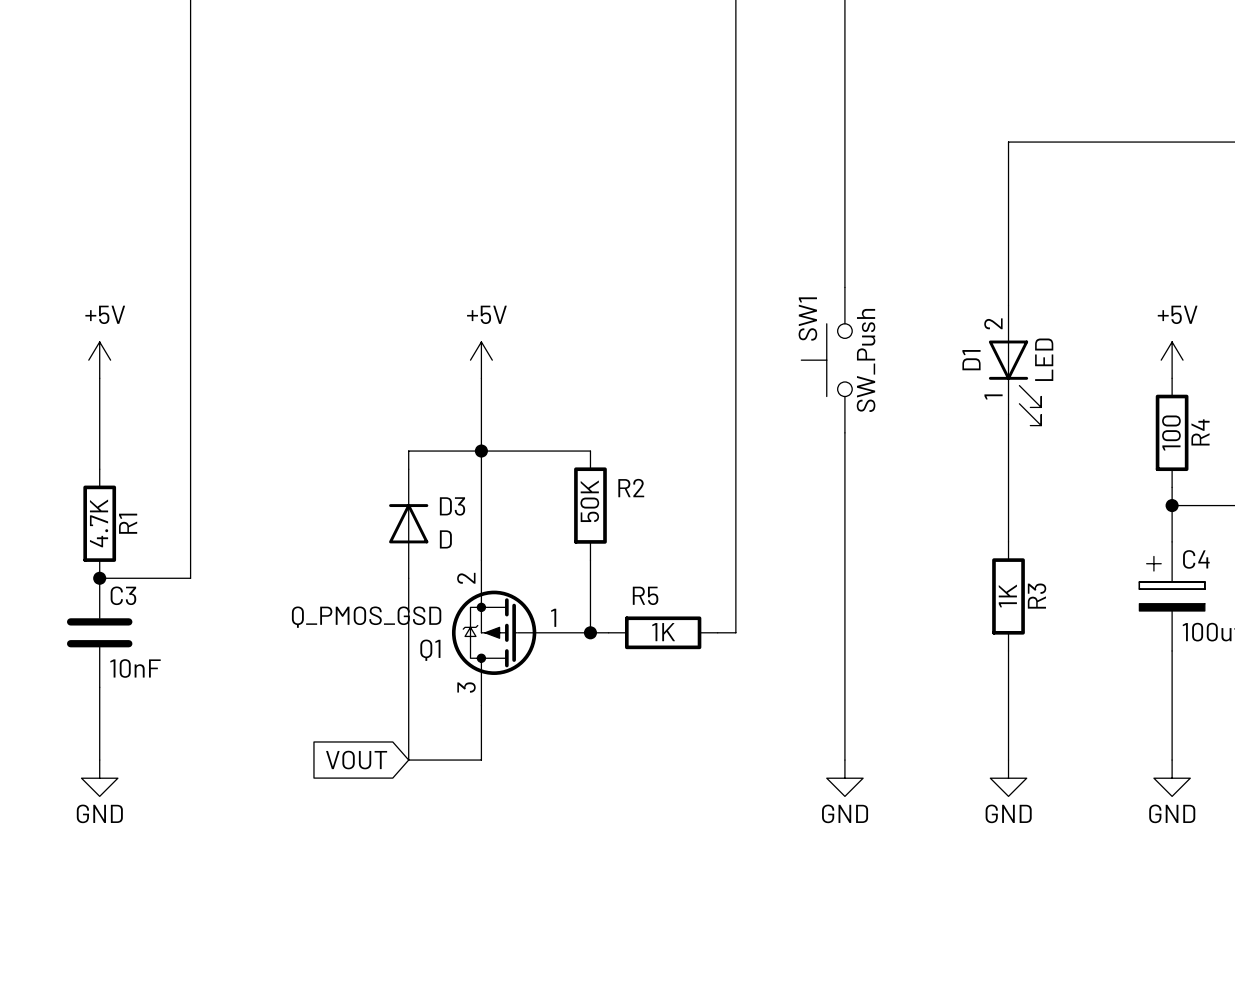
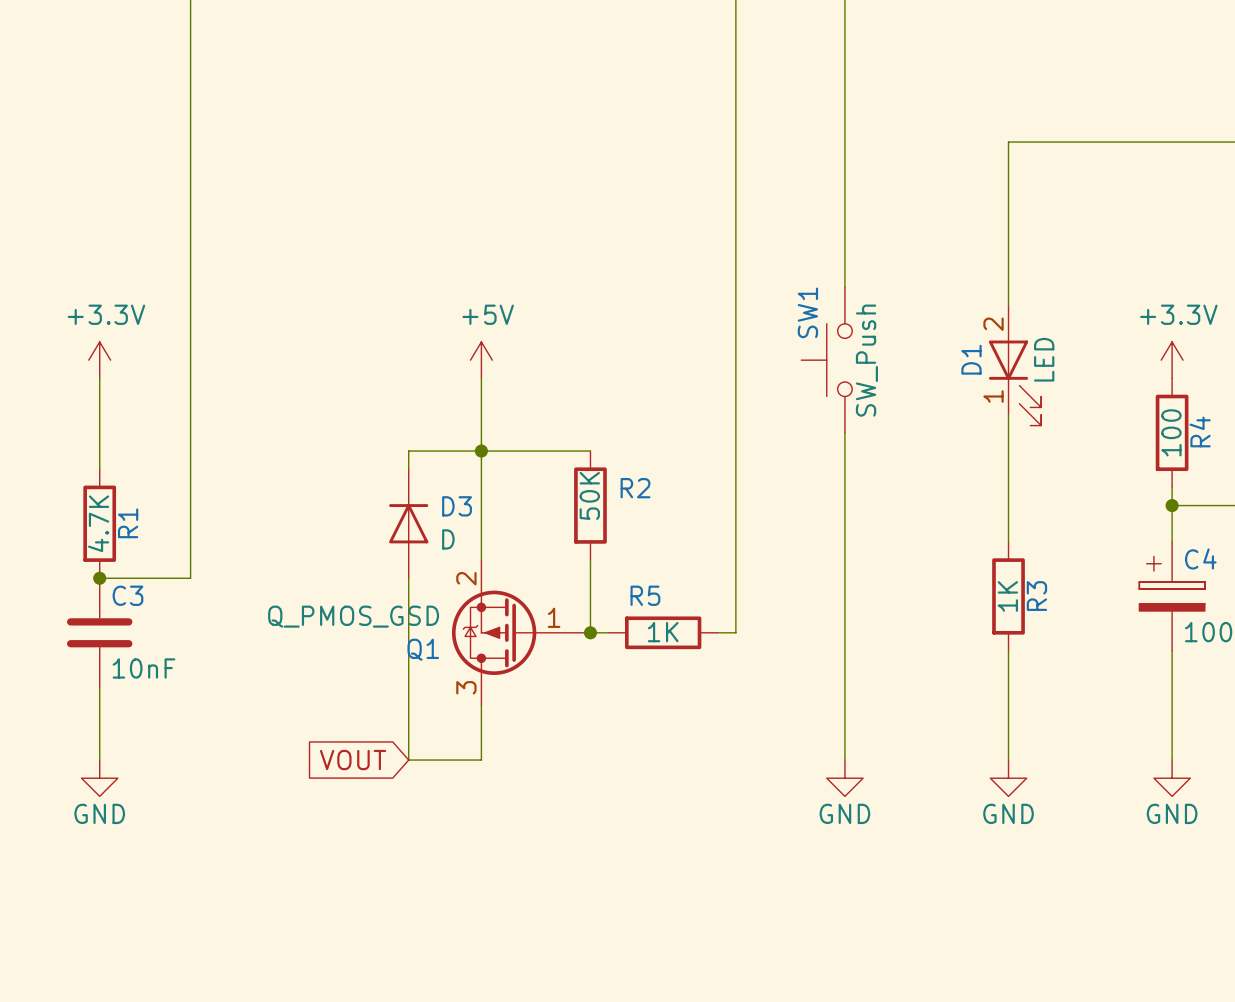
power symbol: +5V (99, 360) -> +3.3V (99, 360)
power symbol: +5V (1172, 360) -> +3.3V (1172, 360)

